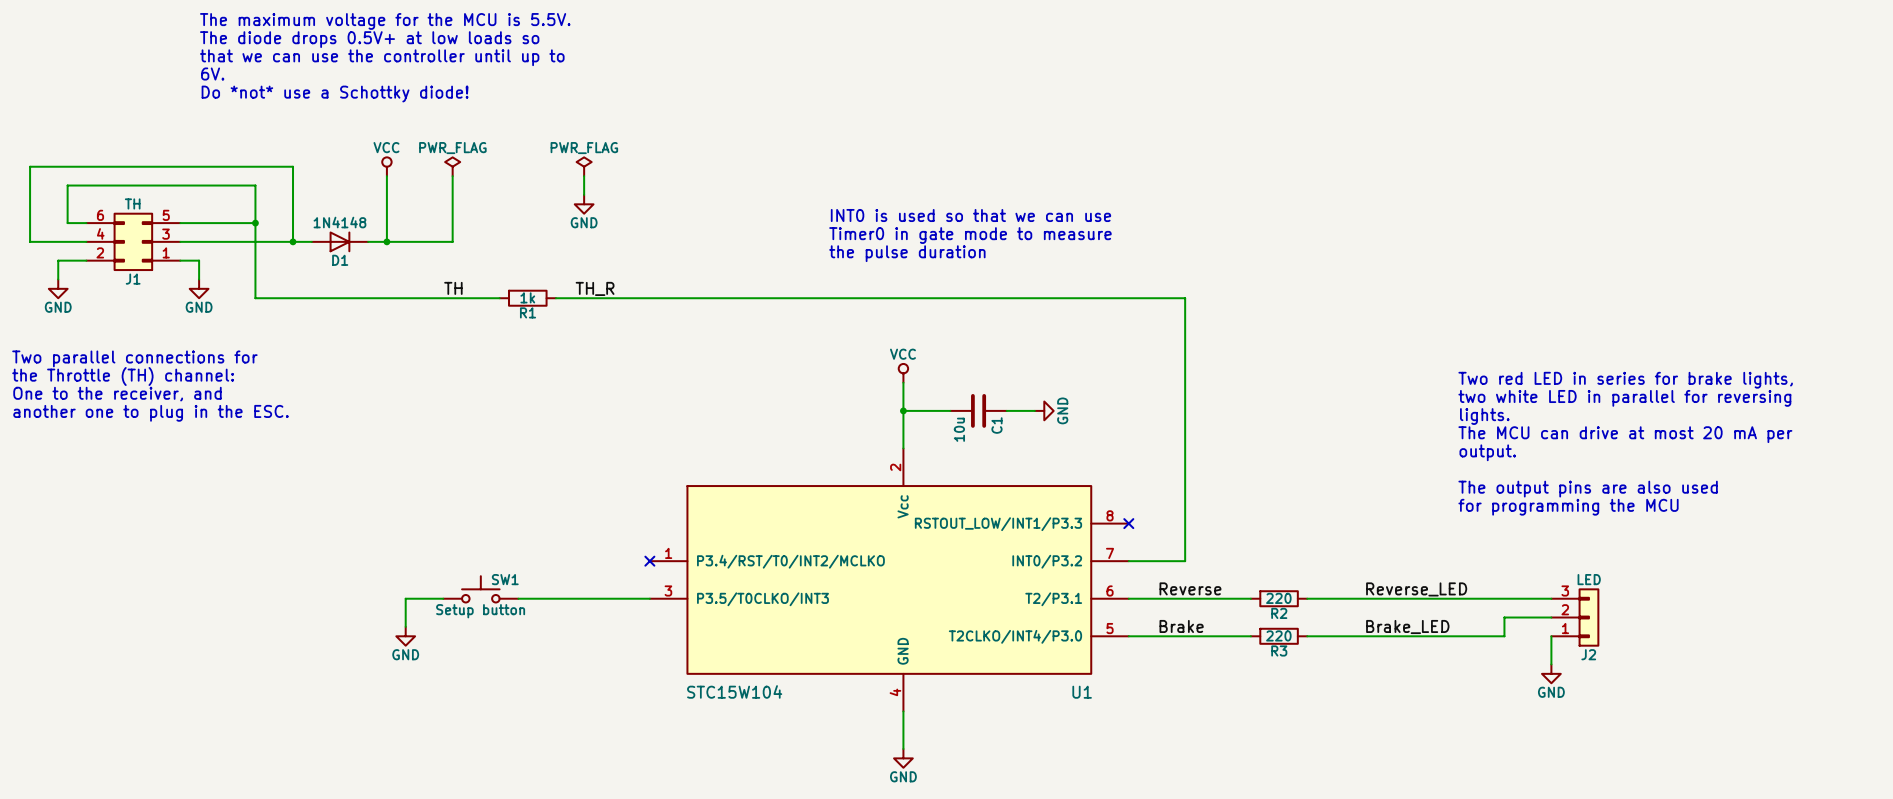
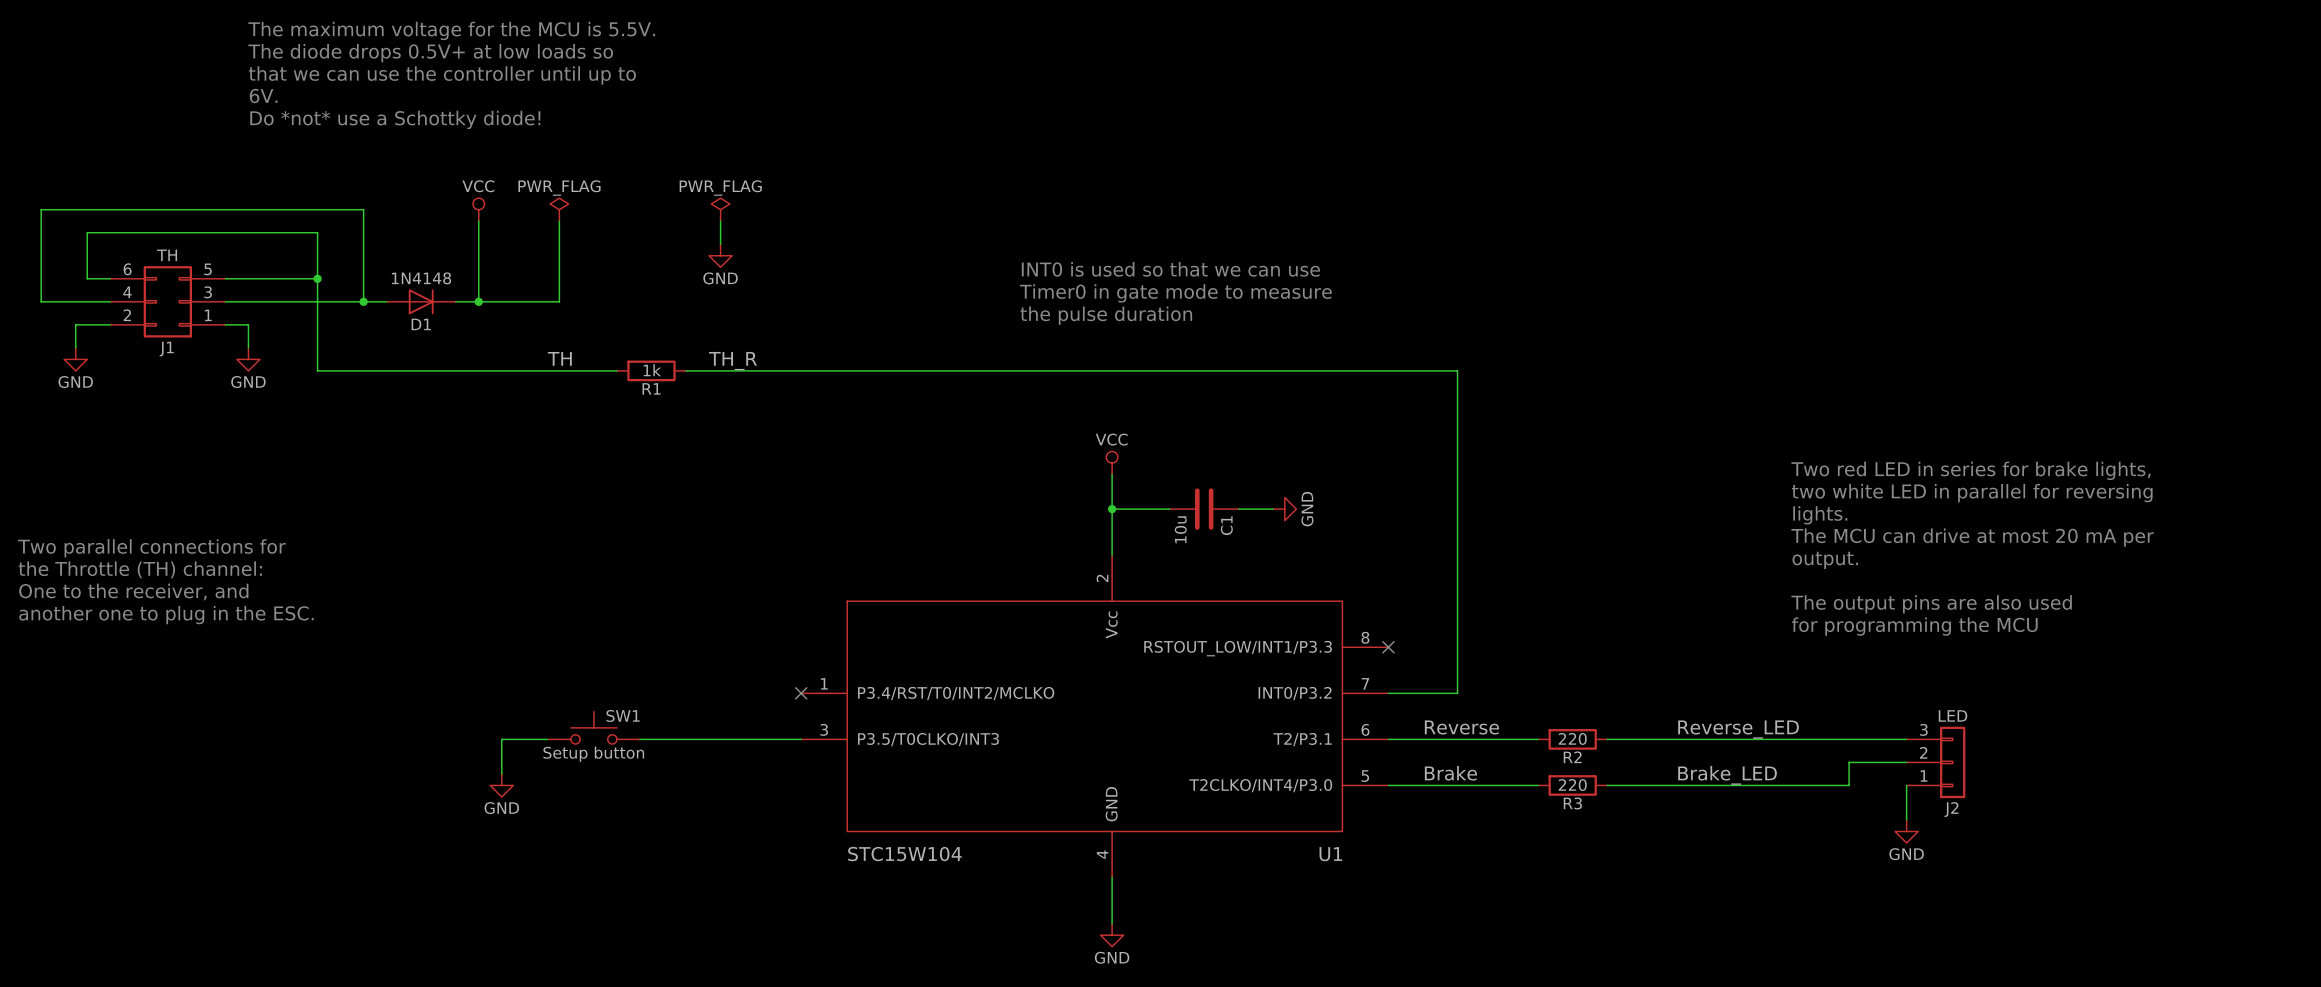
text position: Two parallel connections for (134, 358) -> Two parallel connections for (151, 548)
text position: the Throttle (TH) channel: (123, 376) -> the Throttle (TH) channel: (140, 569)
text position: One to the receiver, and (117, 394) -> One to the receiver, and (133, 591)
text position: another one to plug in the ESC. (151, 413) -> another one to plug in the ESC. (166, 615)

